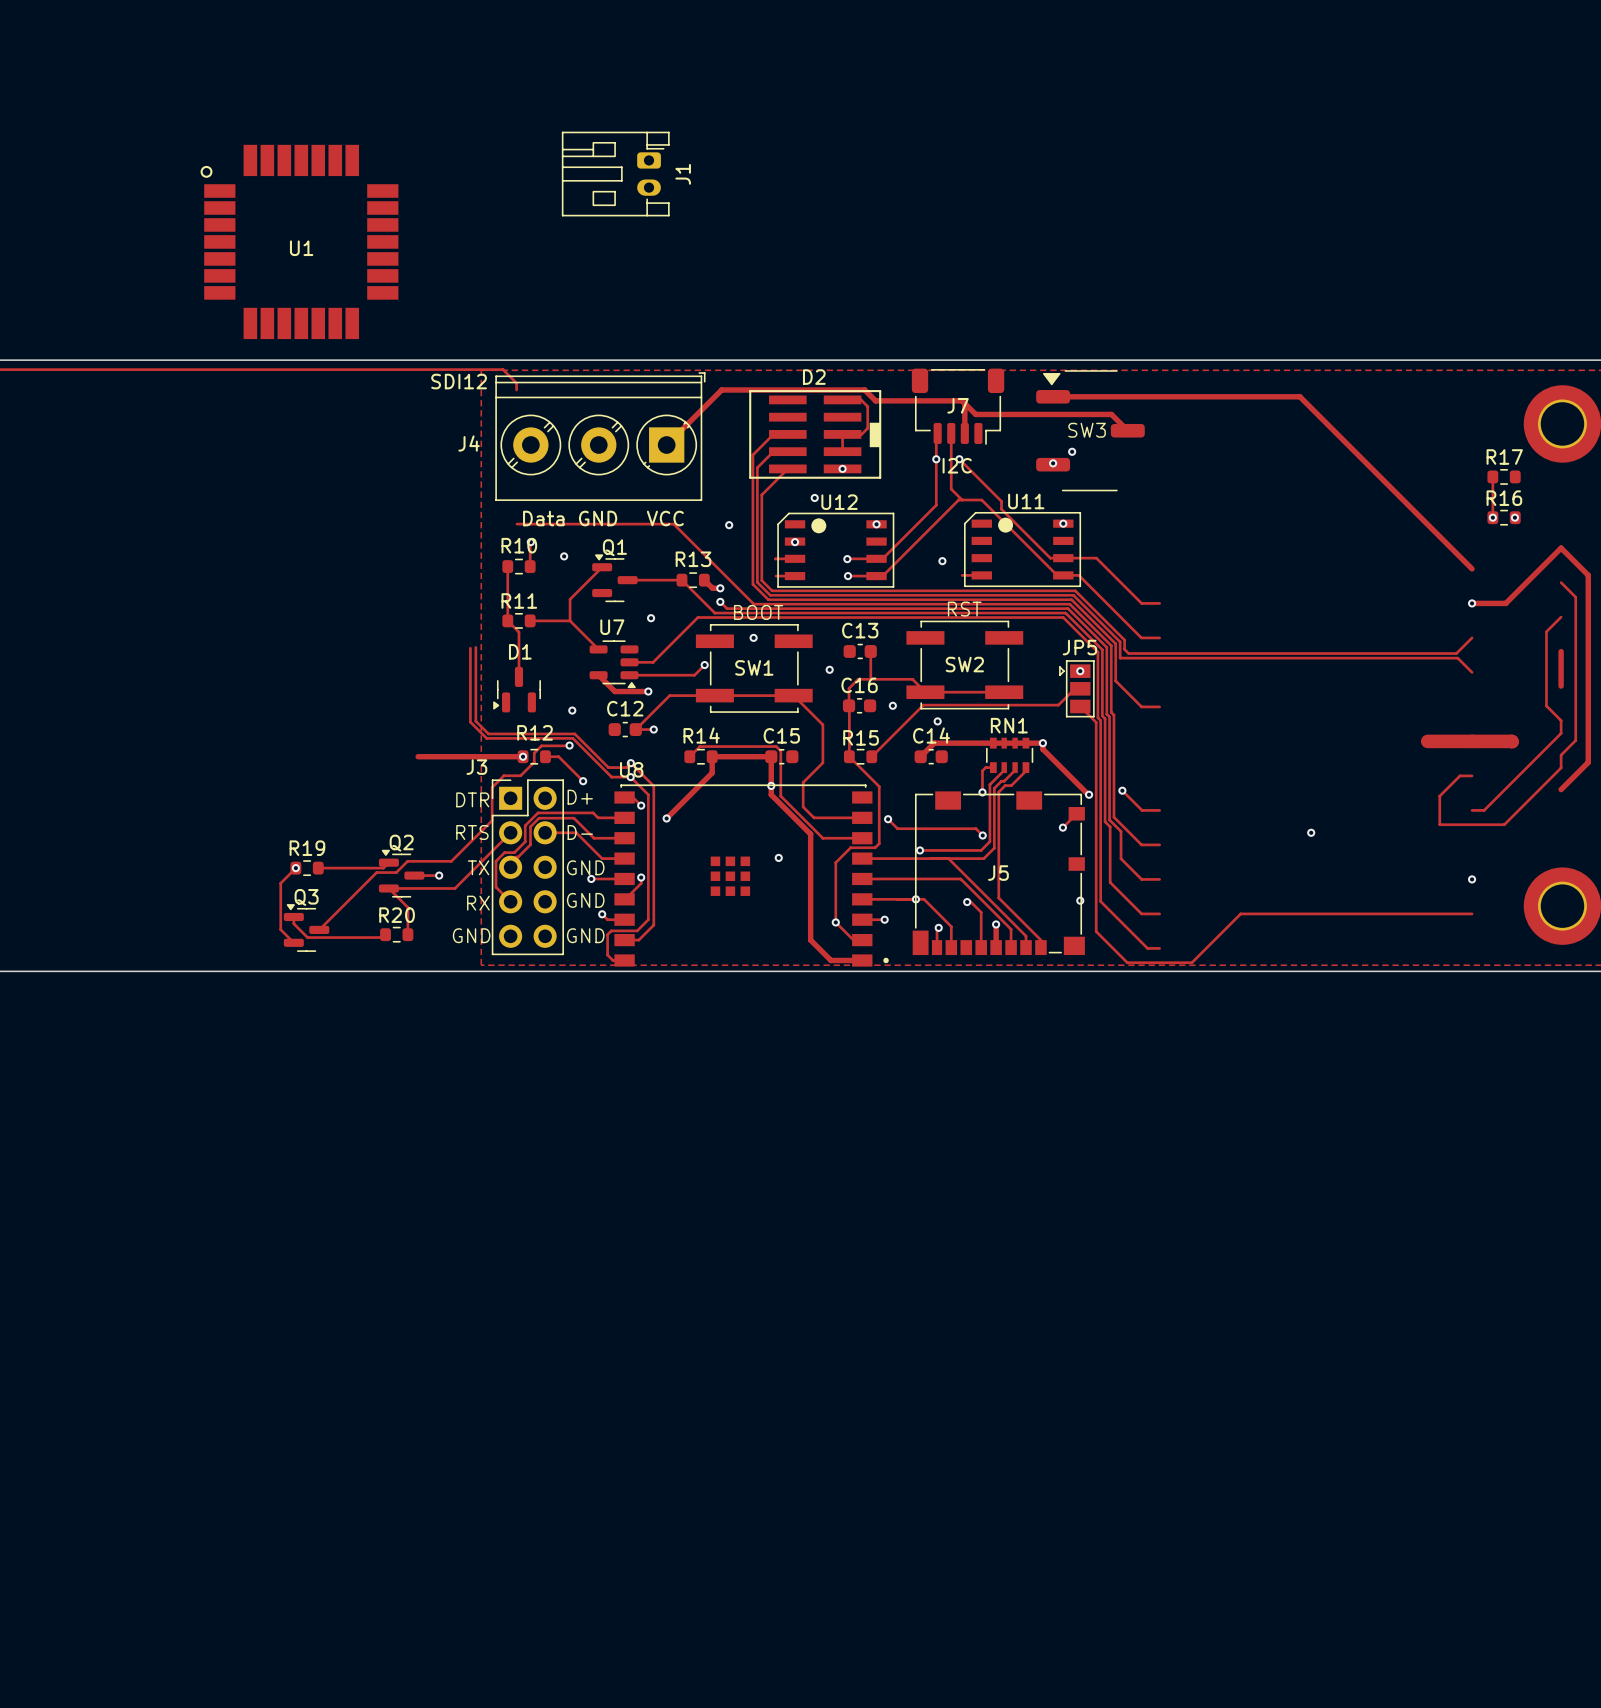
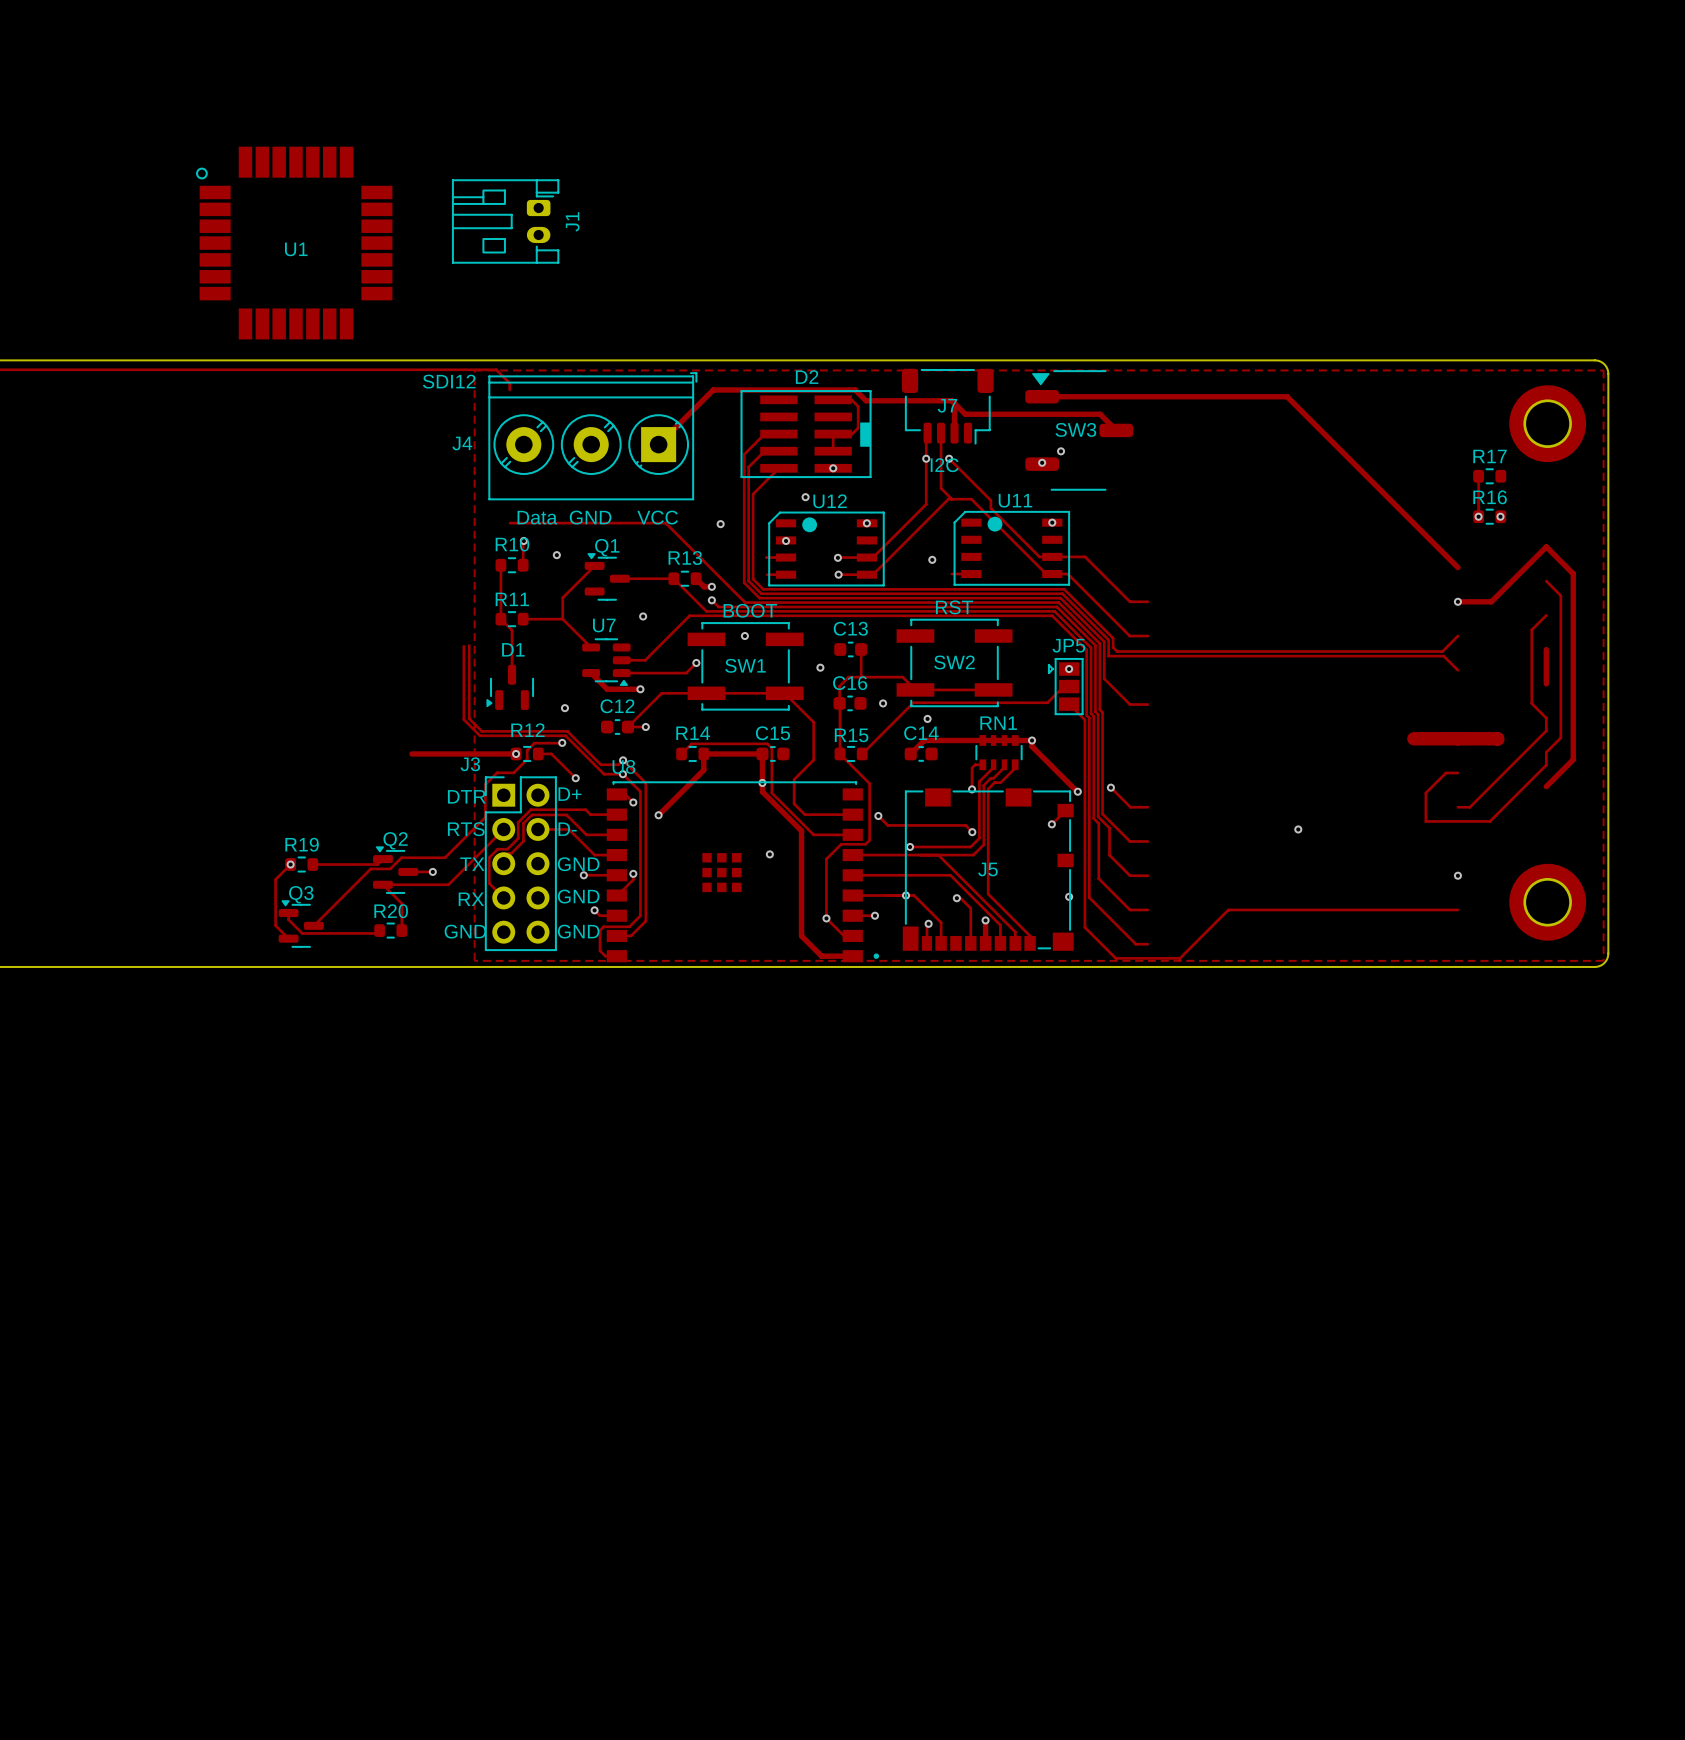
J1 position: (615, 174) -> (505, 221)

